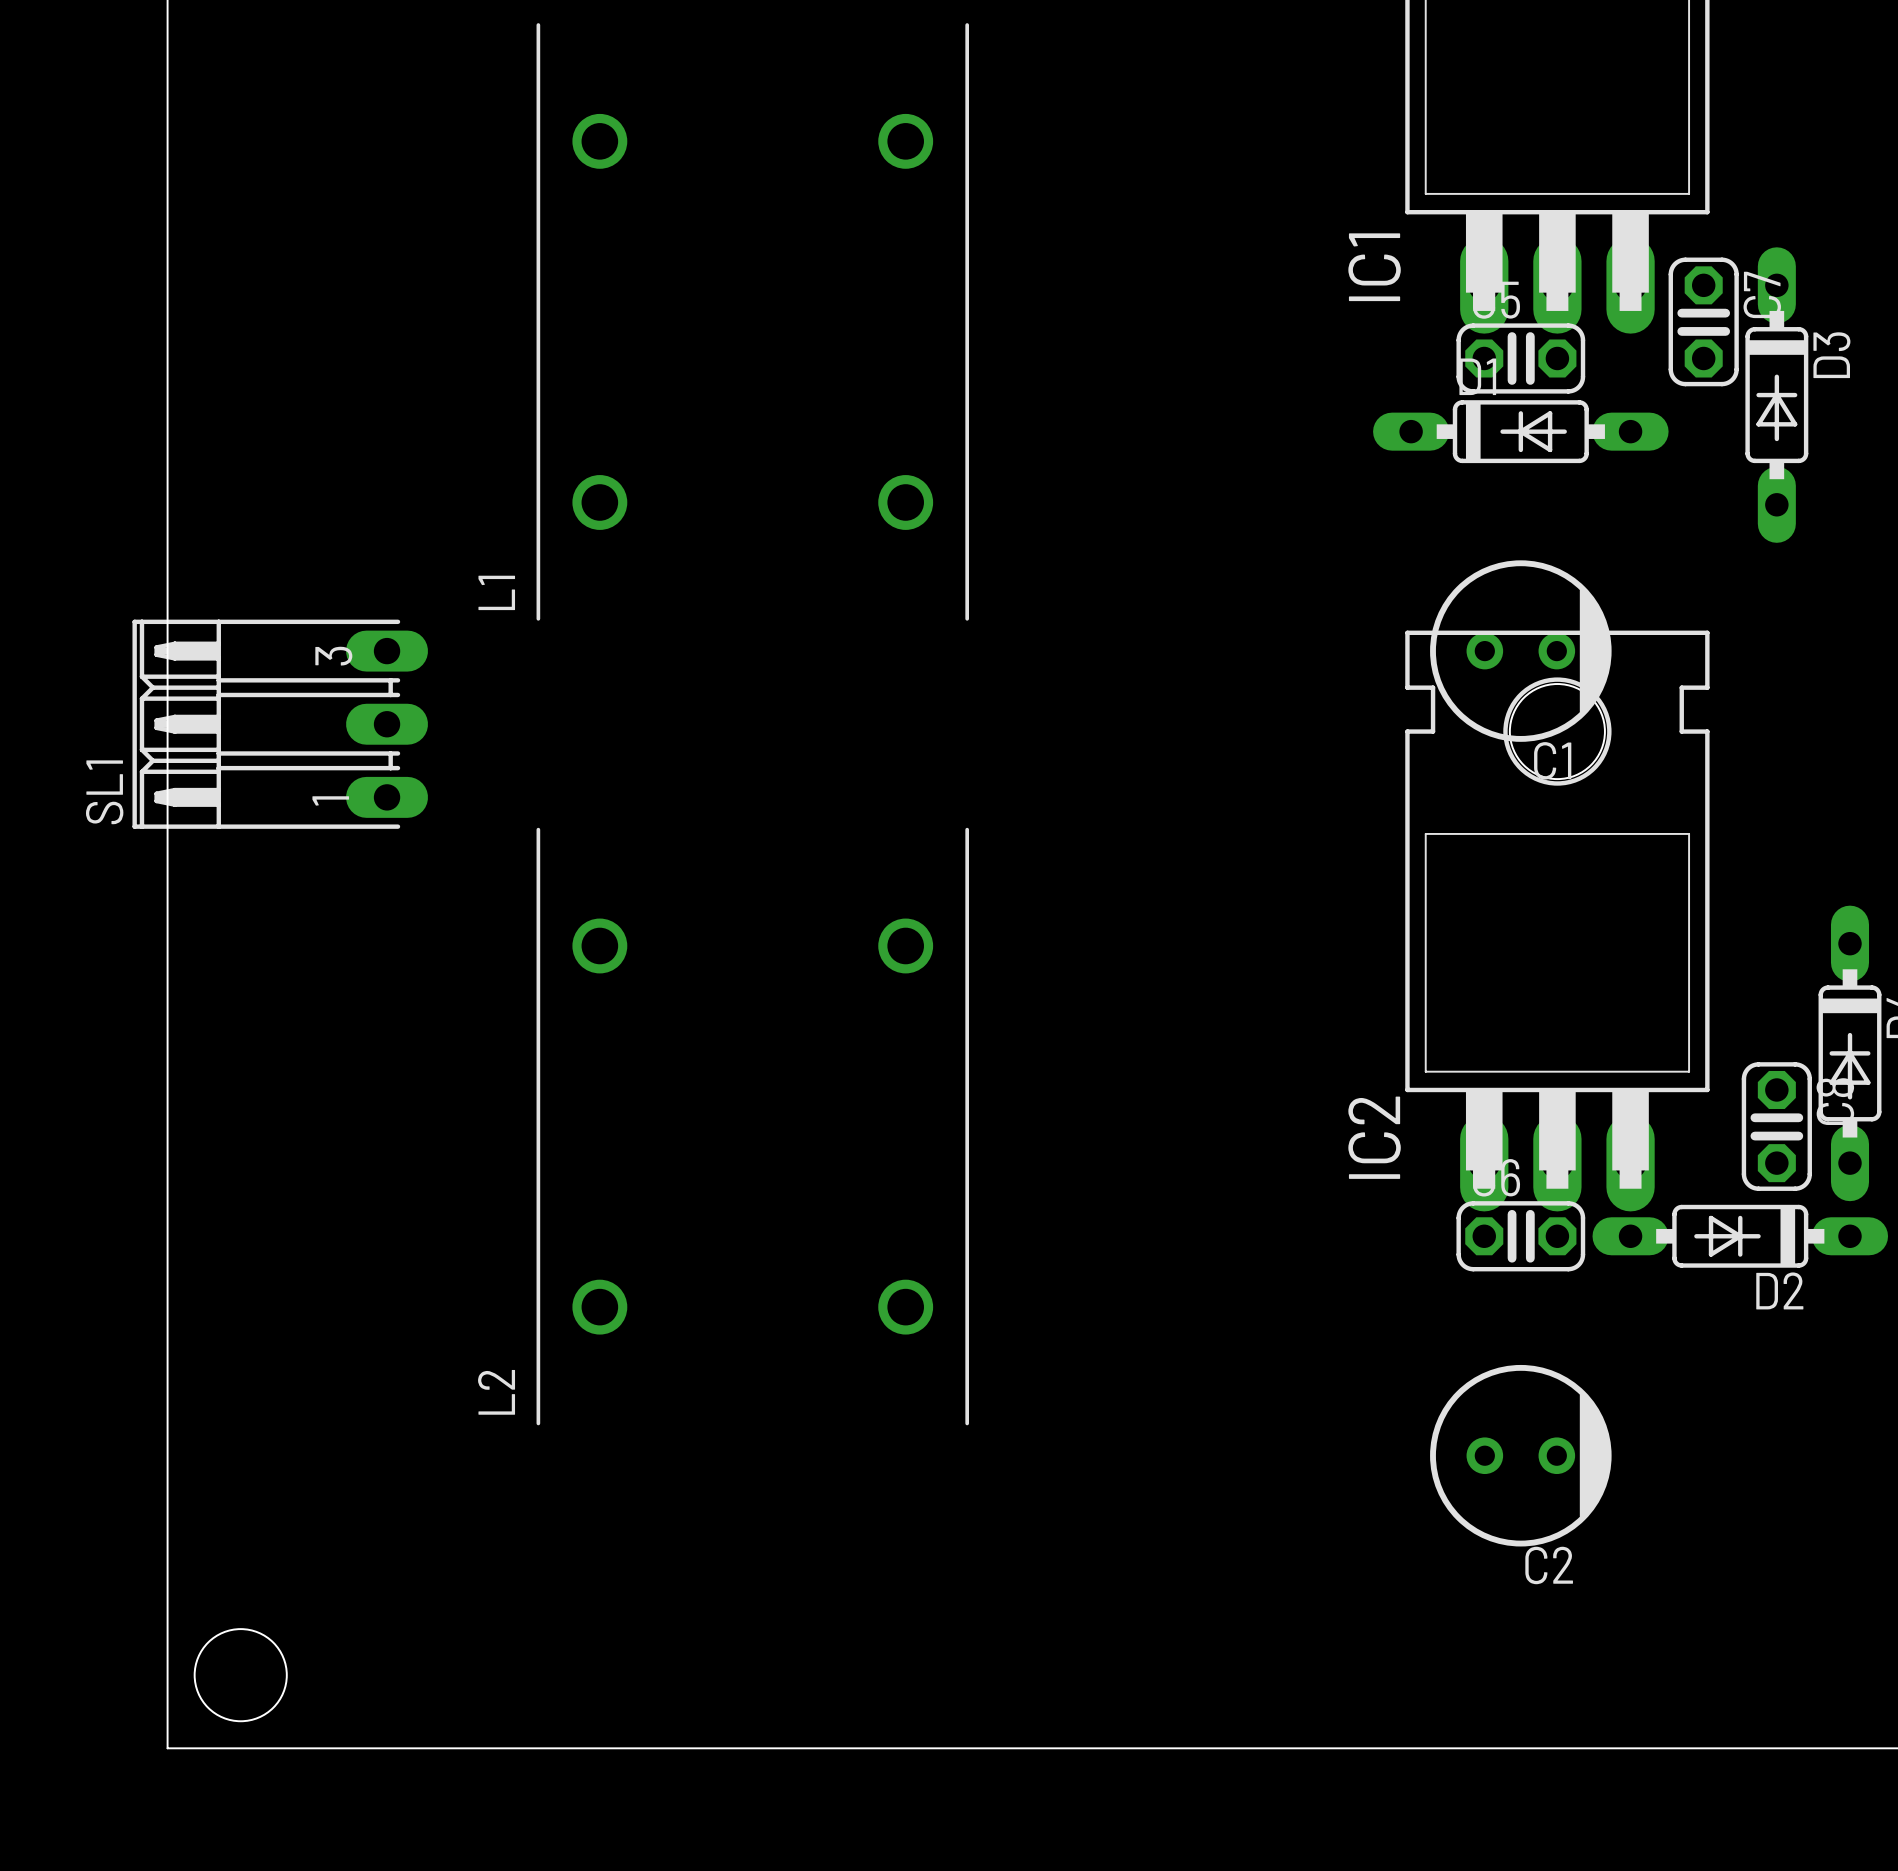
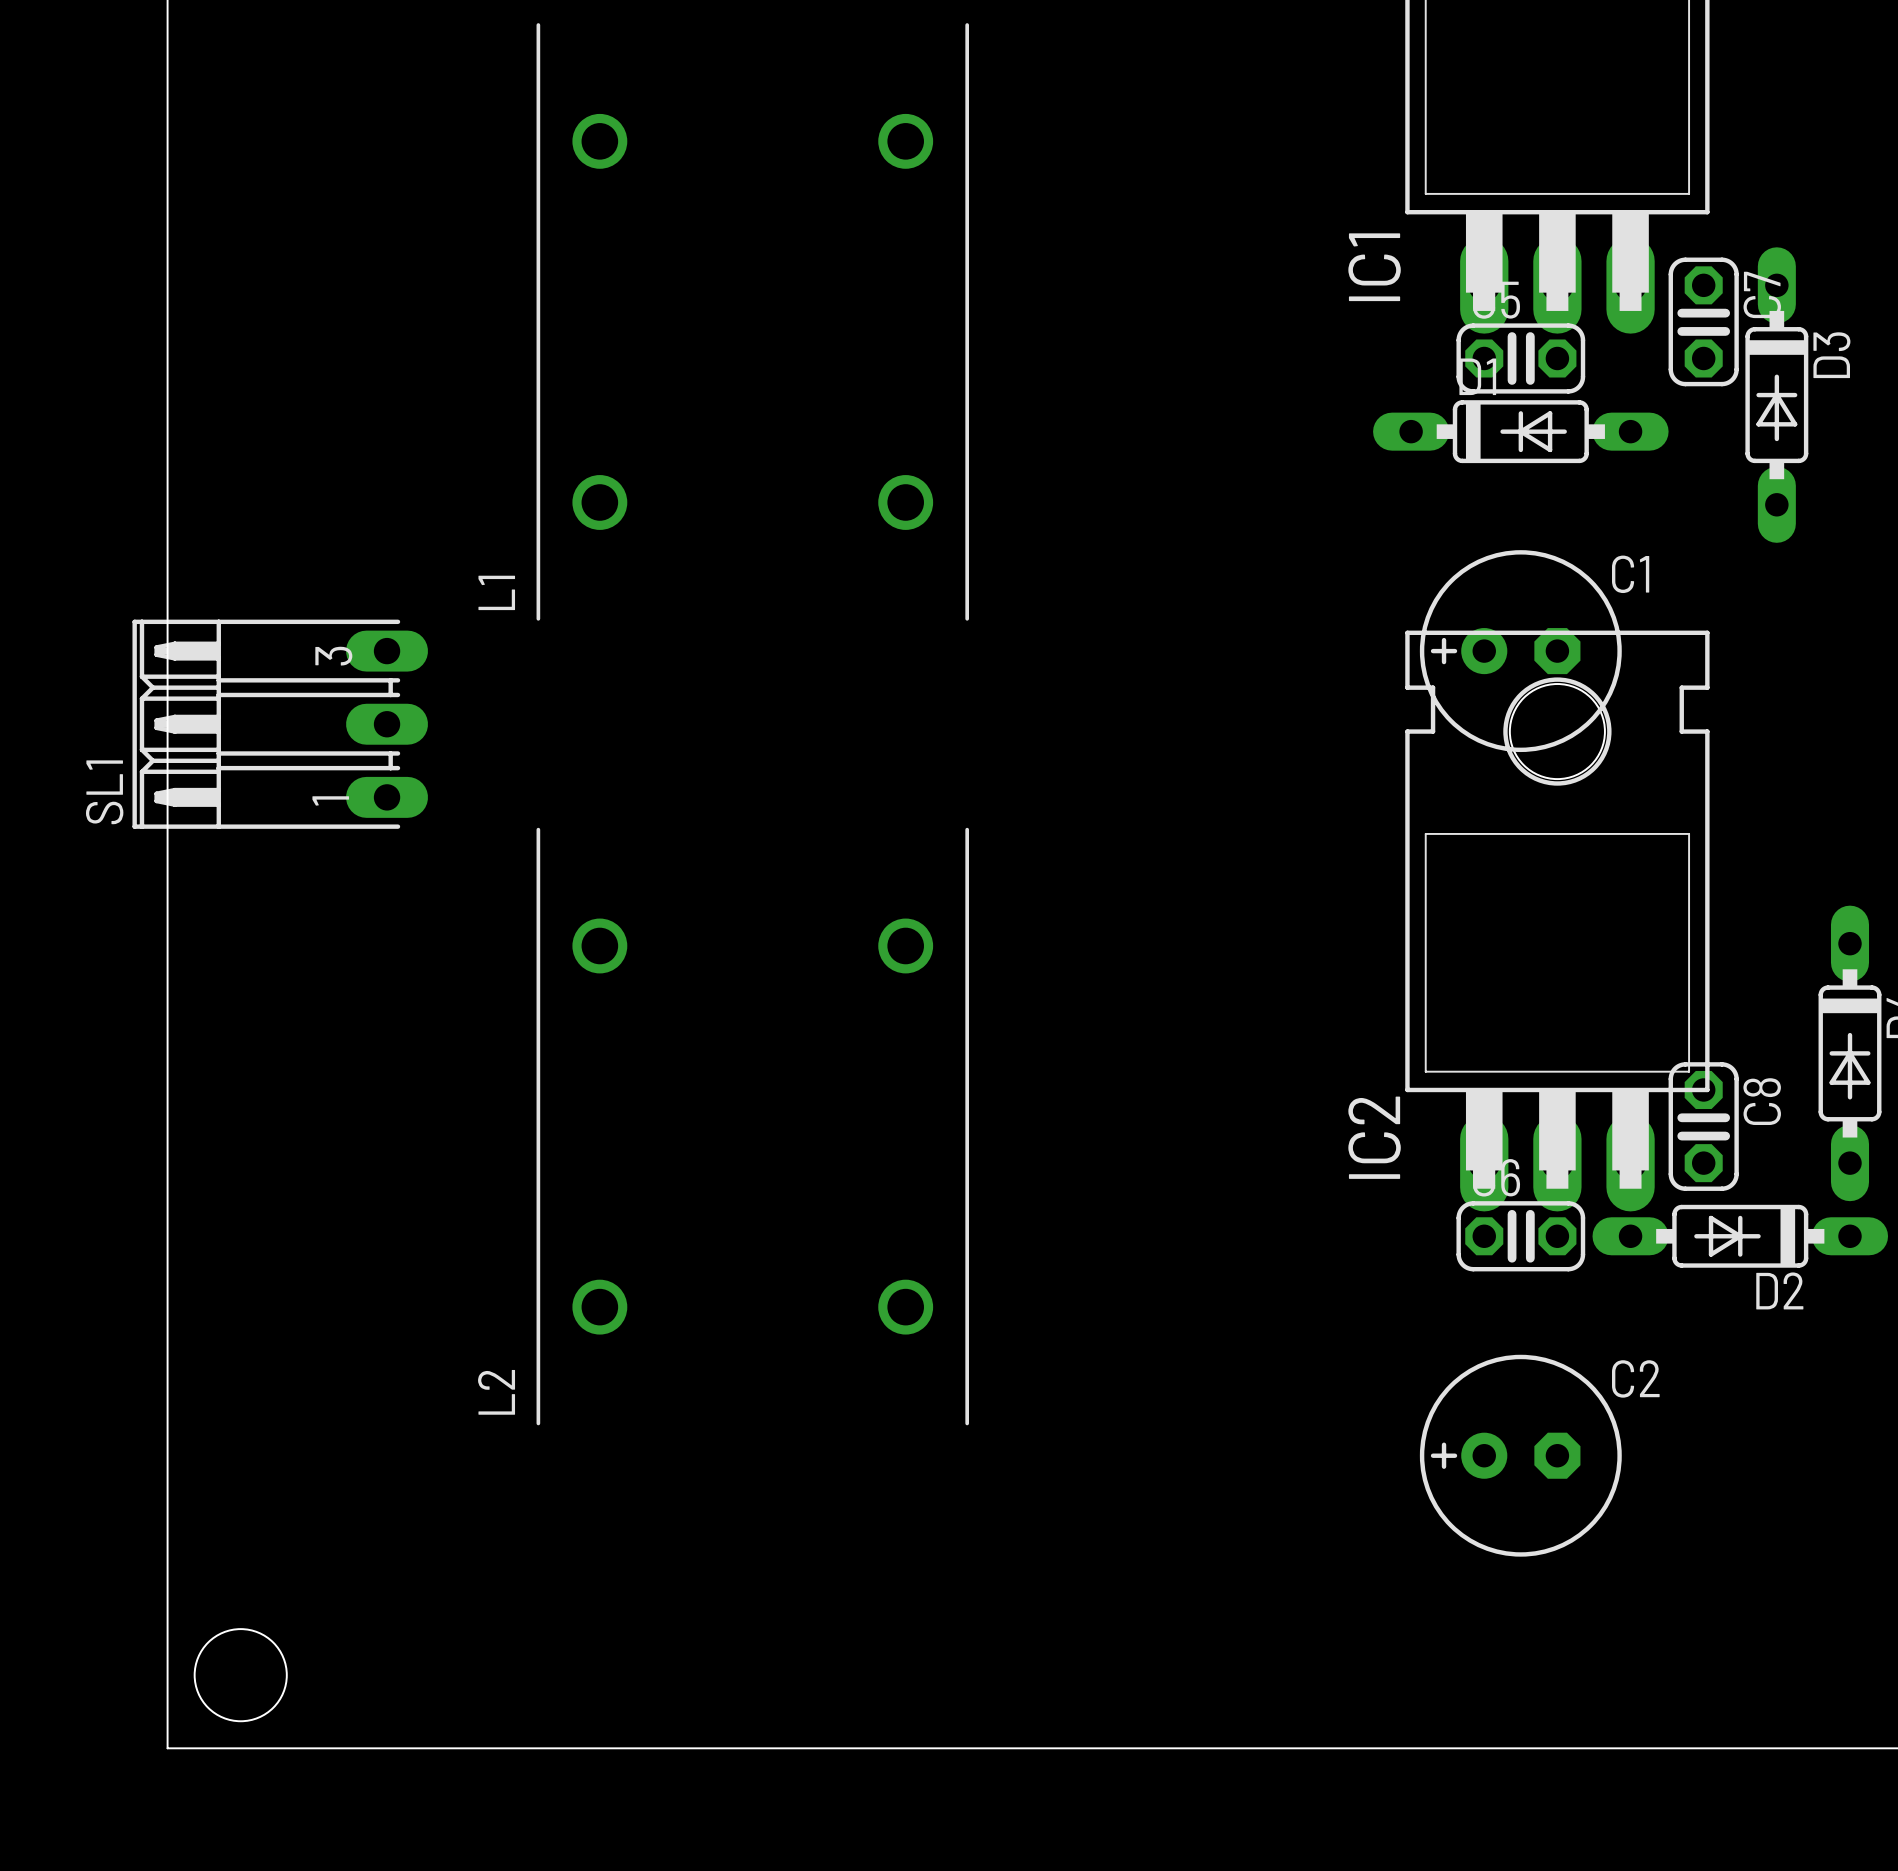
C1 footprint: [1430, 560, 1612, 742] -> [1419, 550, 1622, 753]
C1 name position: C1 (1552, 760) -> C1 (1630, 574)
C8 position: (1776, 1126) -> (1703, 1126)
C2 footprint: [1430, 1364, 1612, 1547] -> [1419, 1354, 1622, 1557]
C2 name position: C2 (1549, 1565) -> C2 (1635, 1378)

